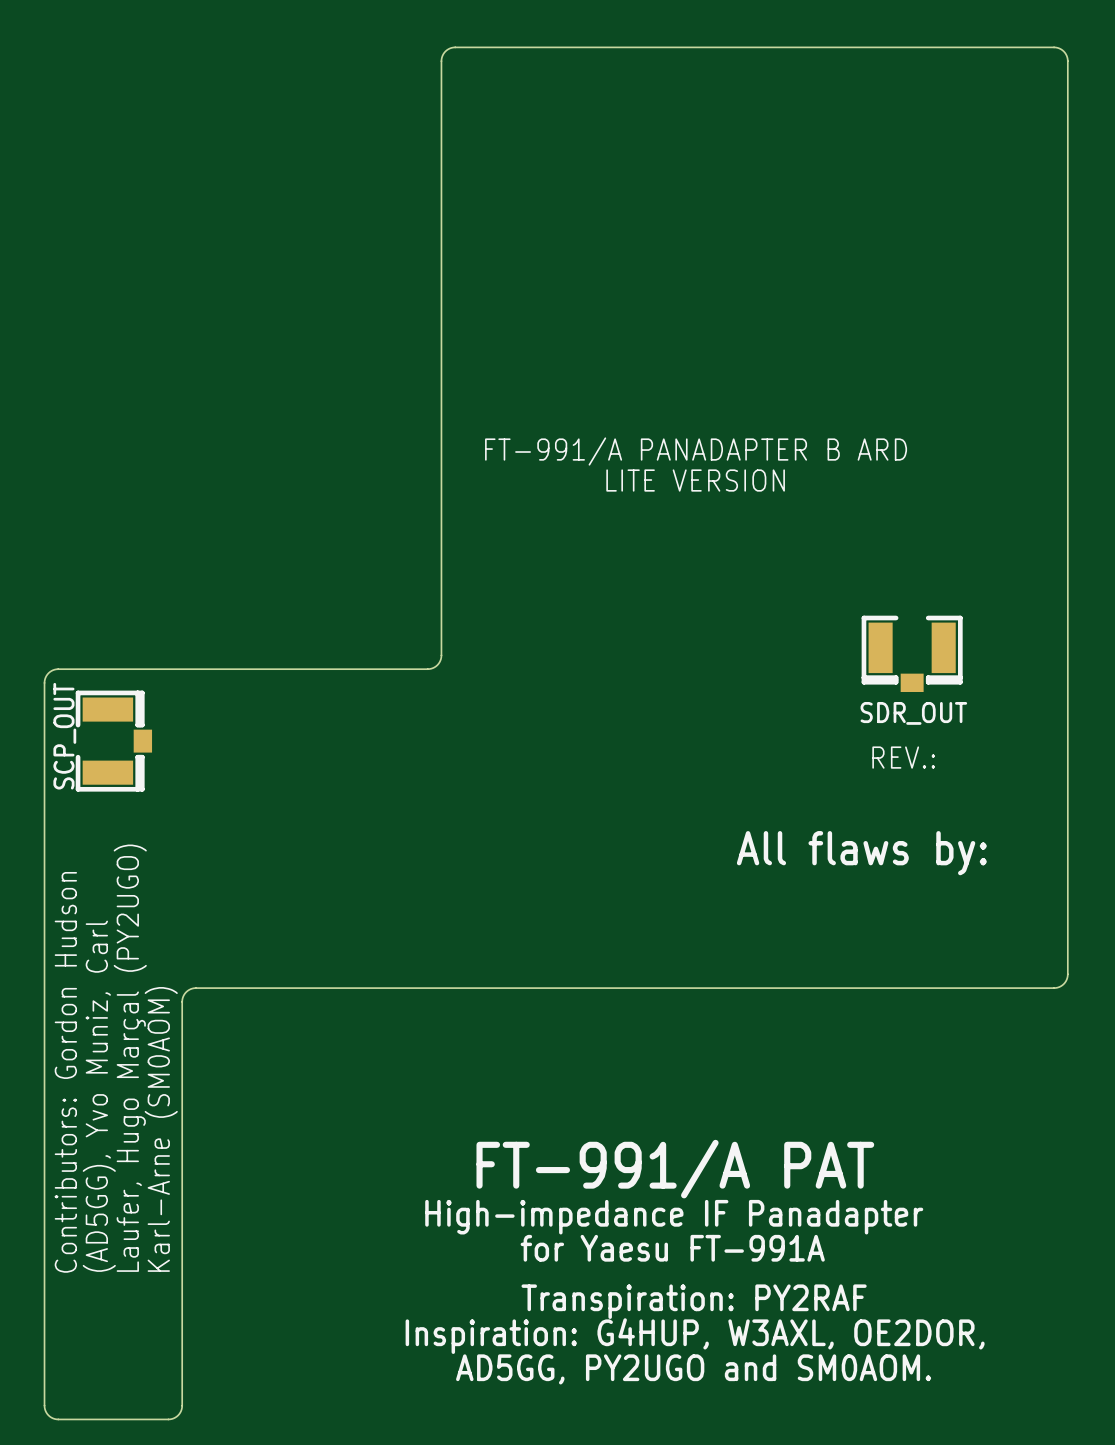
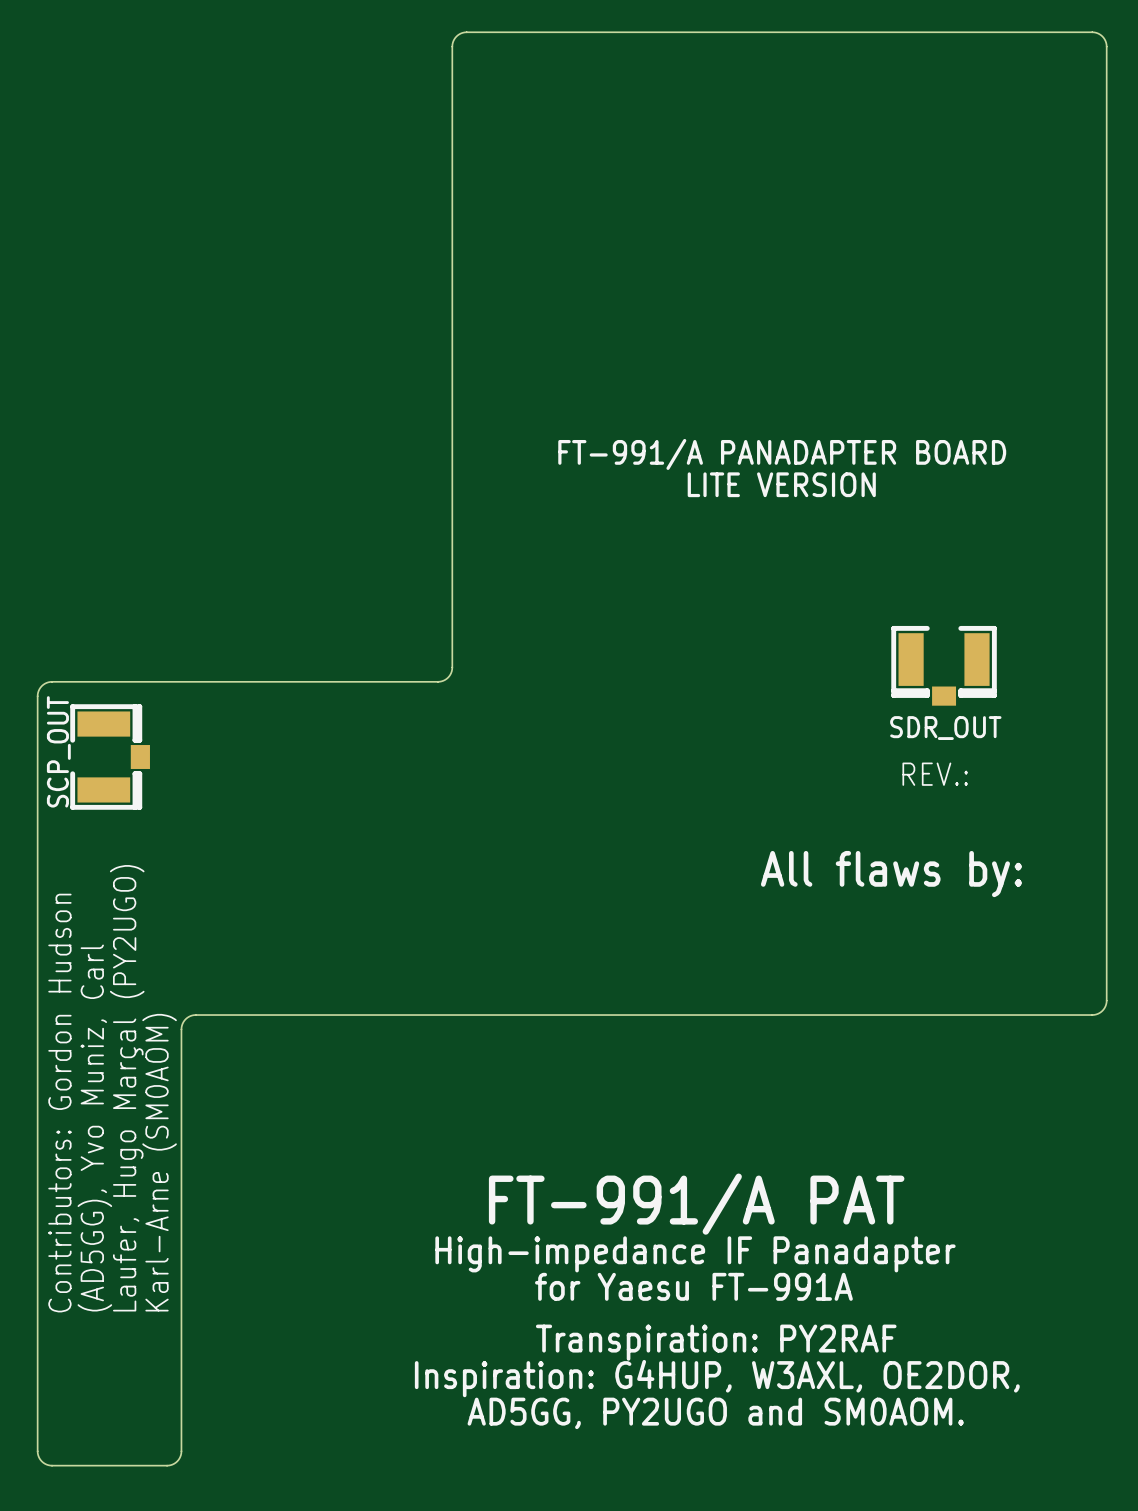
text: FT-991/A PANADAPTER B ARD (696, 451) -> FT-991/A PANADAPTER BOARD (782, 454)
text position: LITE VERSION (695, 480) -> LITE VERSION (781, 484)

